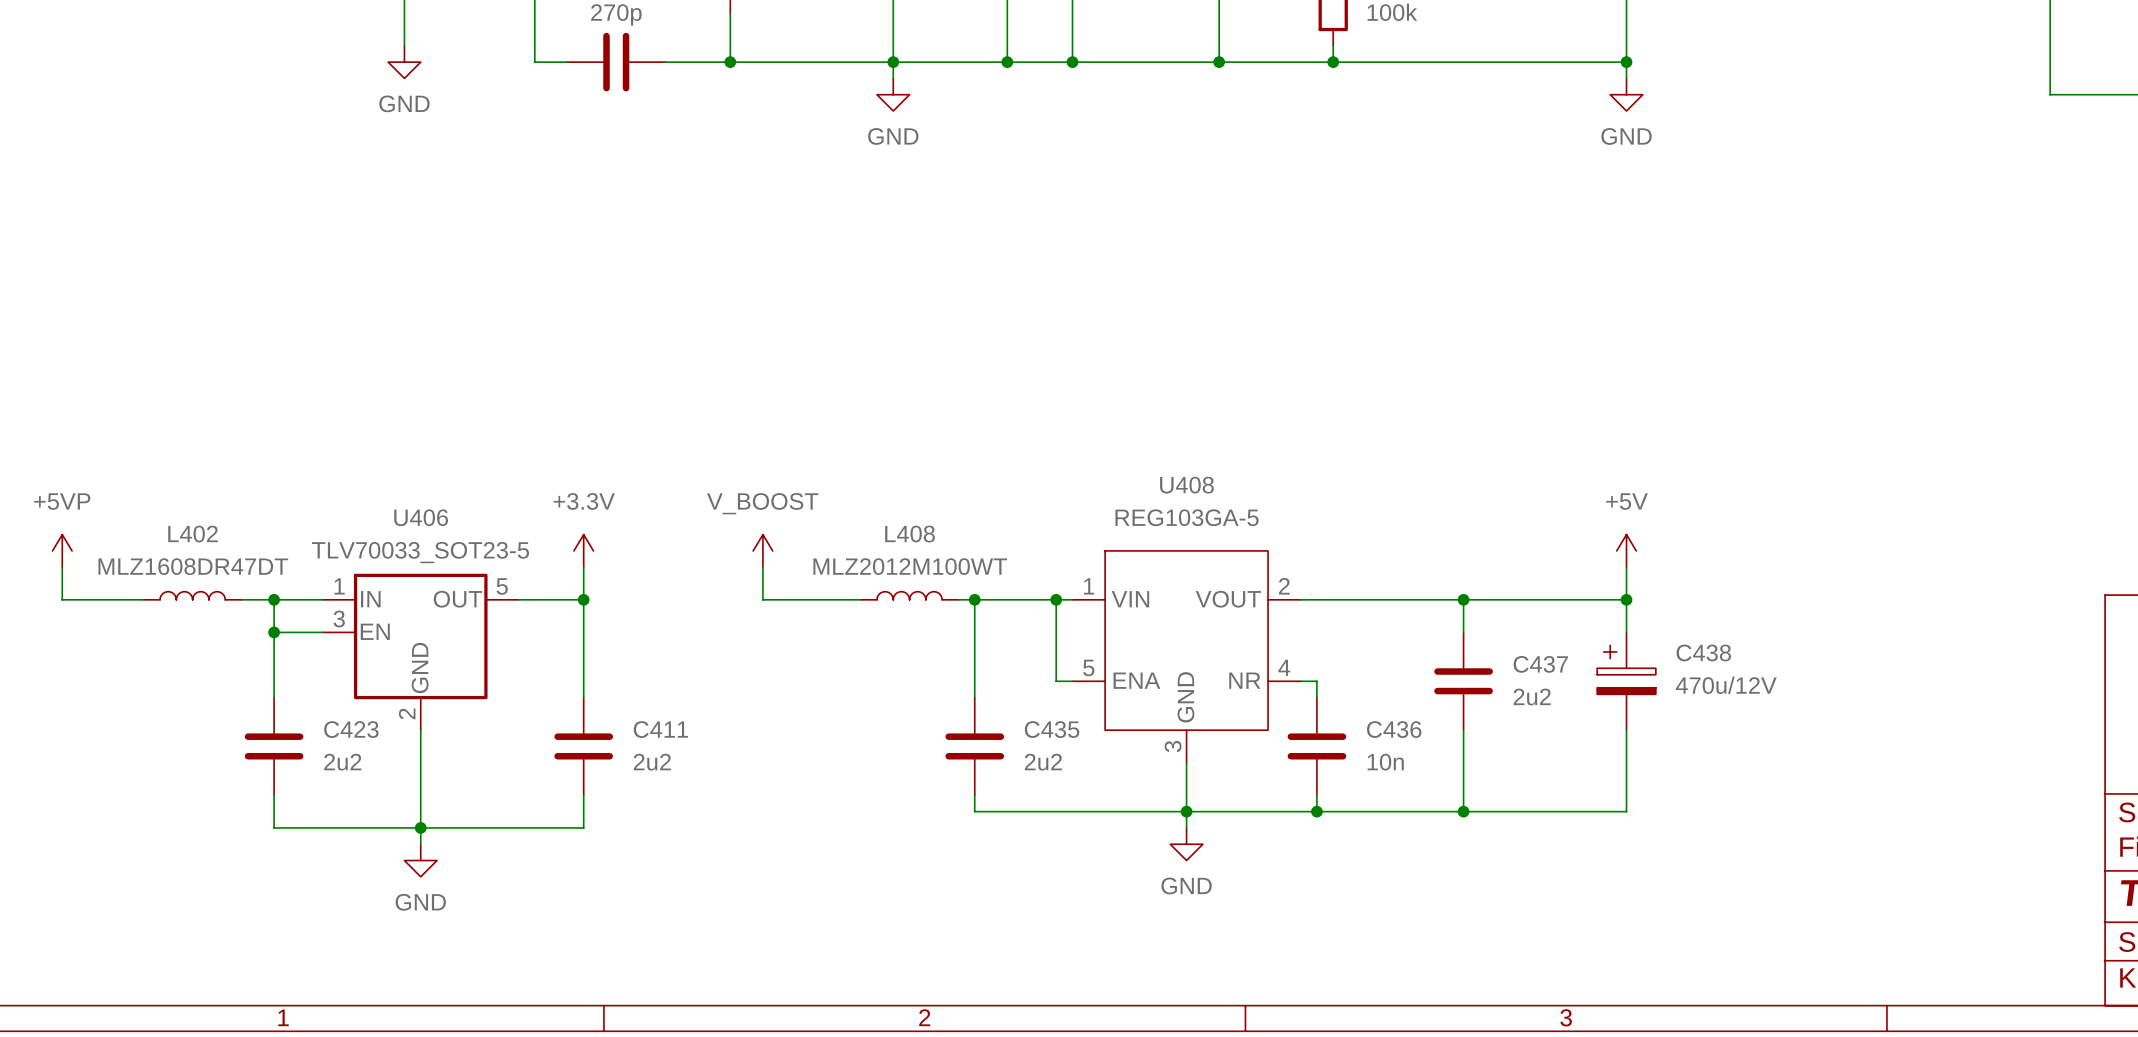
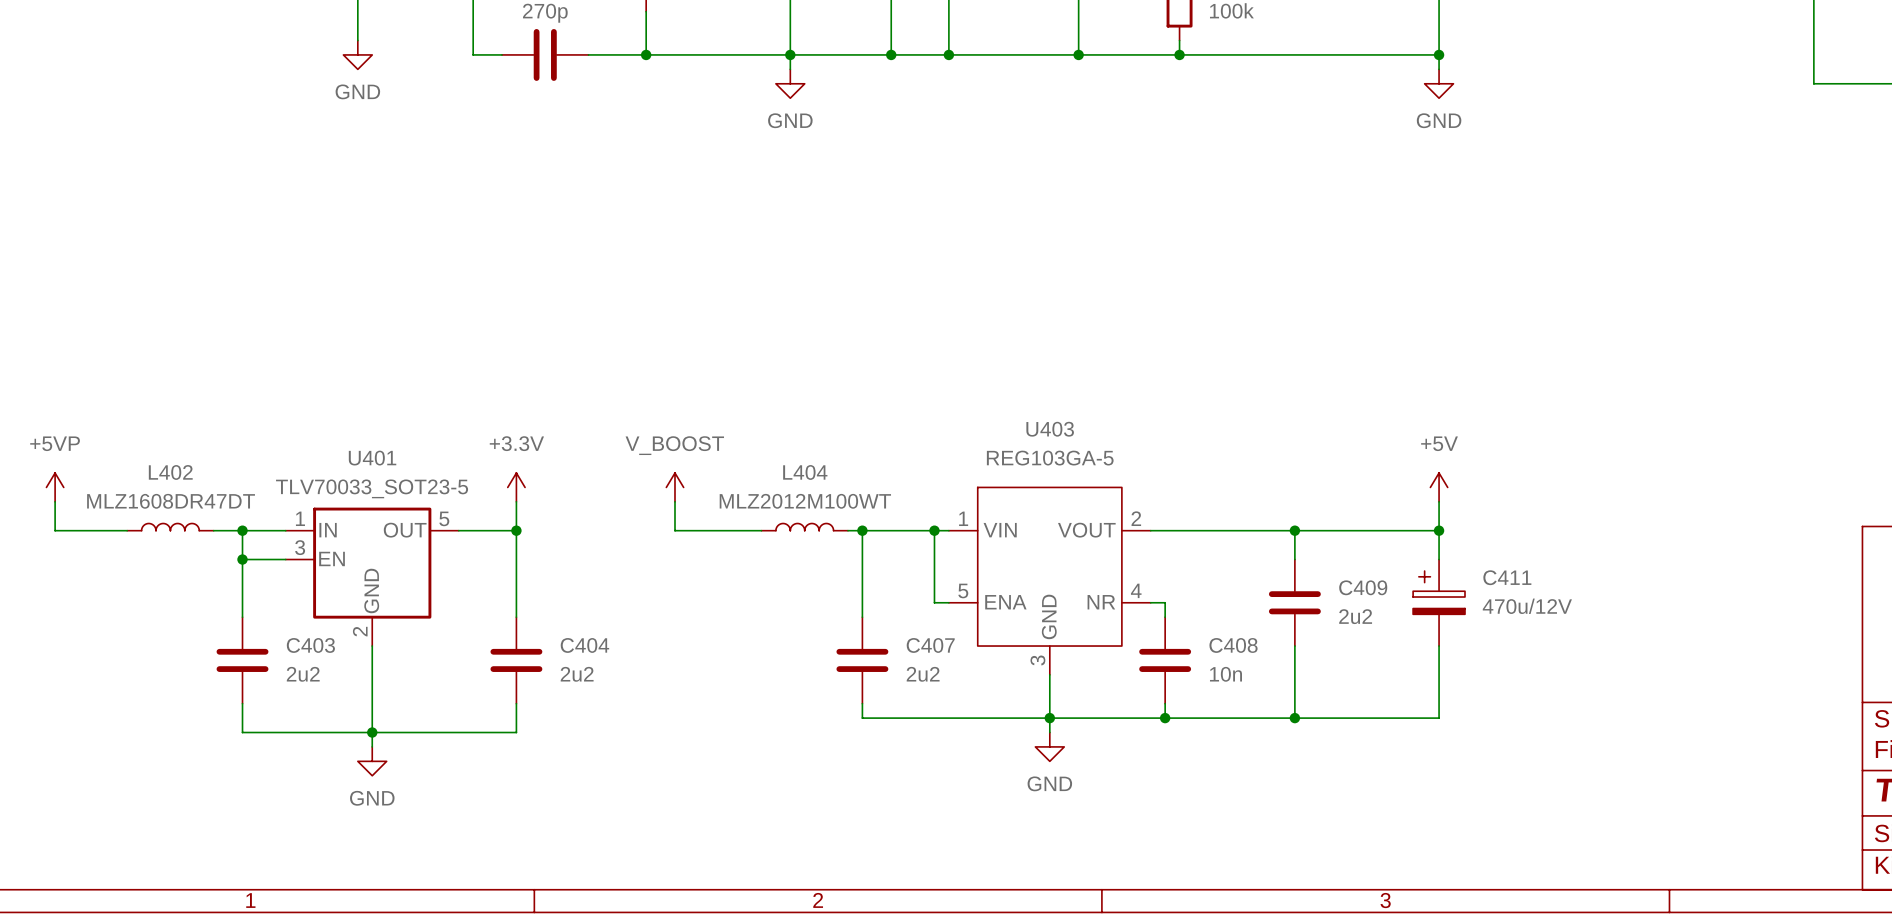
U408 name: U408 (1186, 485) -> U403 (1050, 429)
U406 name: U406 (421, 517) -> U401 (372, 458)
L408 name: L408 (910, 534) -> L404 (805, 472)
C438 name: C438 (1703, 652) -> C411 (1507, 577)
C437 name: C437 (1540, 664) -> C409 (1363, 587)
C423 name: C423 (351, 729) -> C403 (310, 645)
C411 name: C411 (660, 729) -> C404 (584, 645)
C435 name: C435 (1052, 729) -> C407 (930, 645)
C436 name: C436 (1394, 729) -> C408 (1233, 645)

